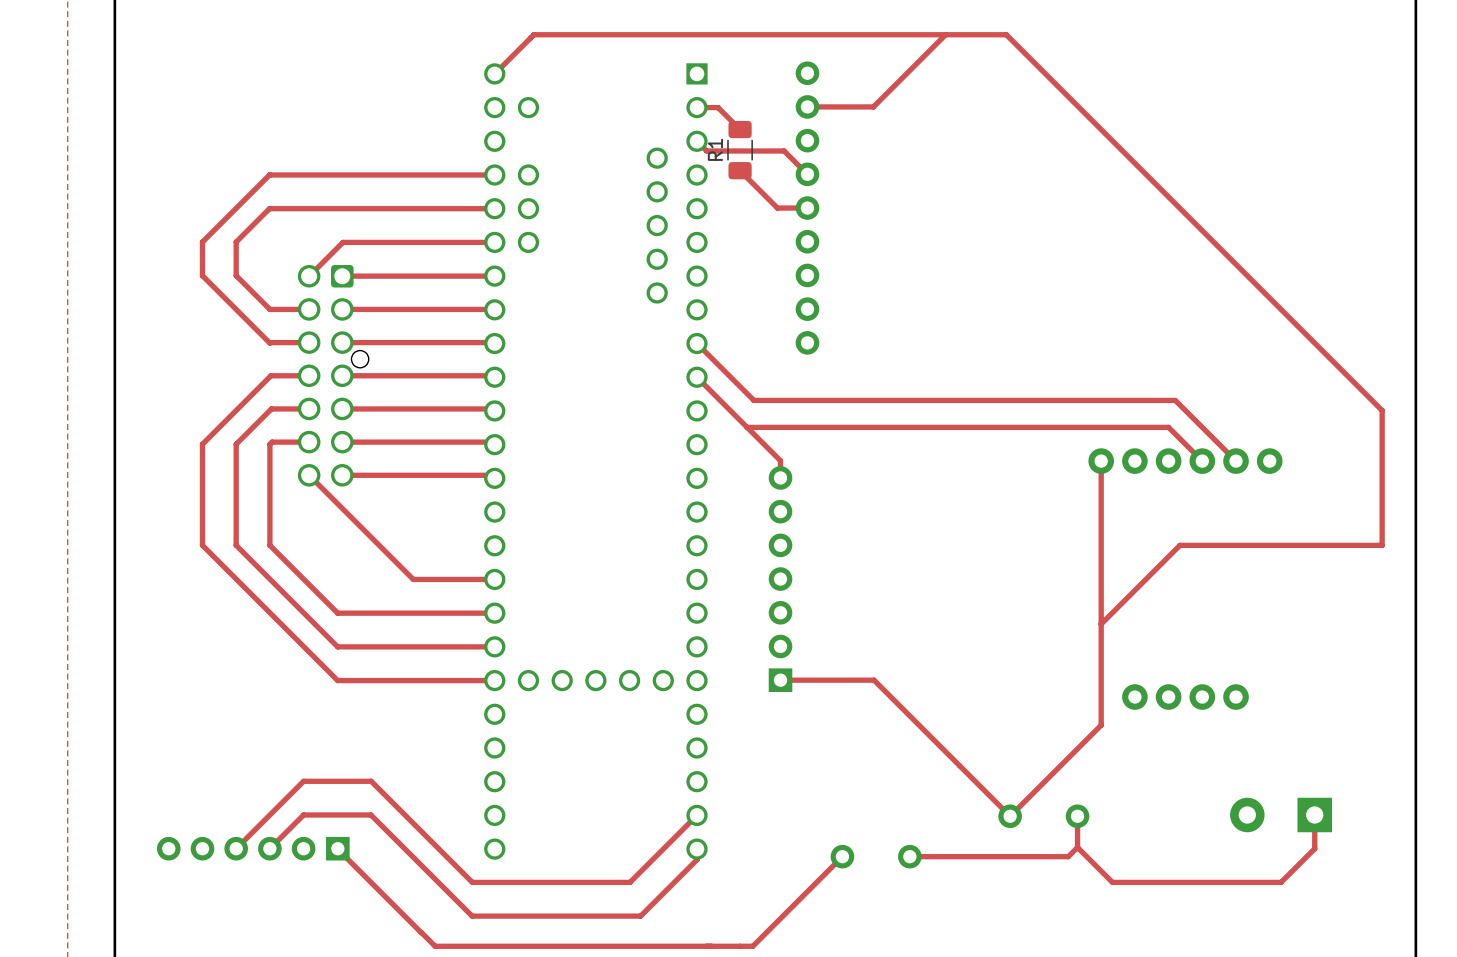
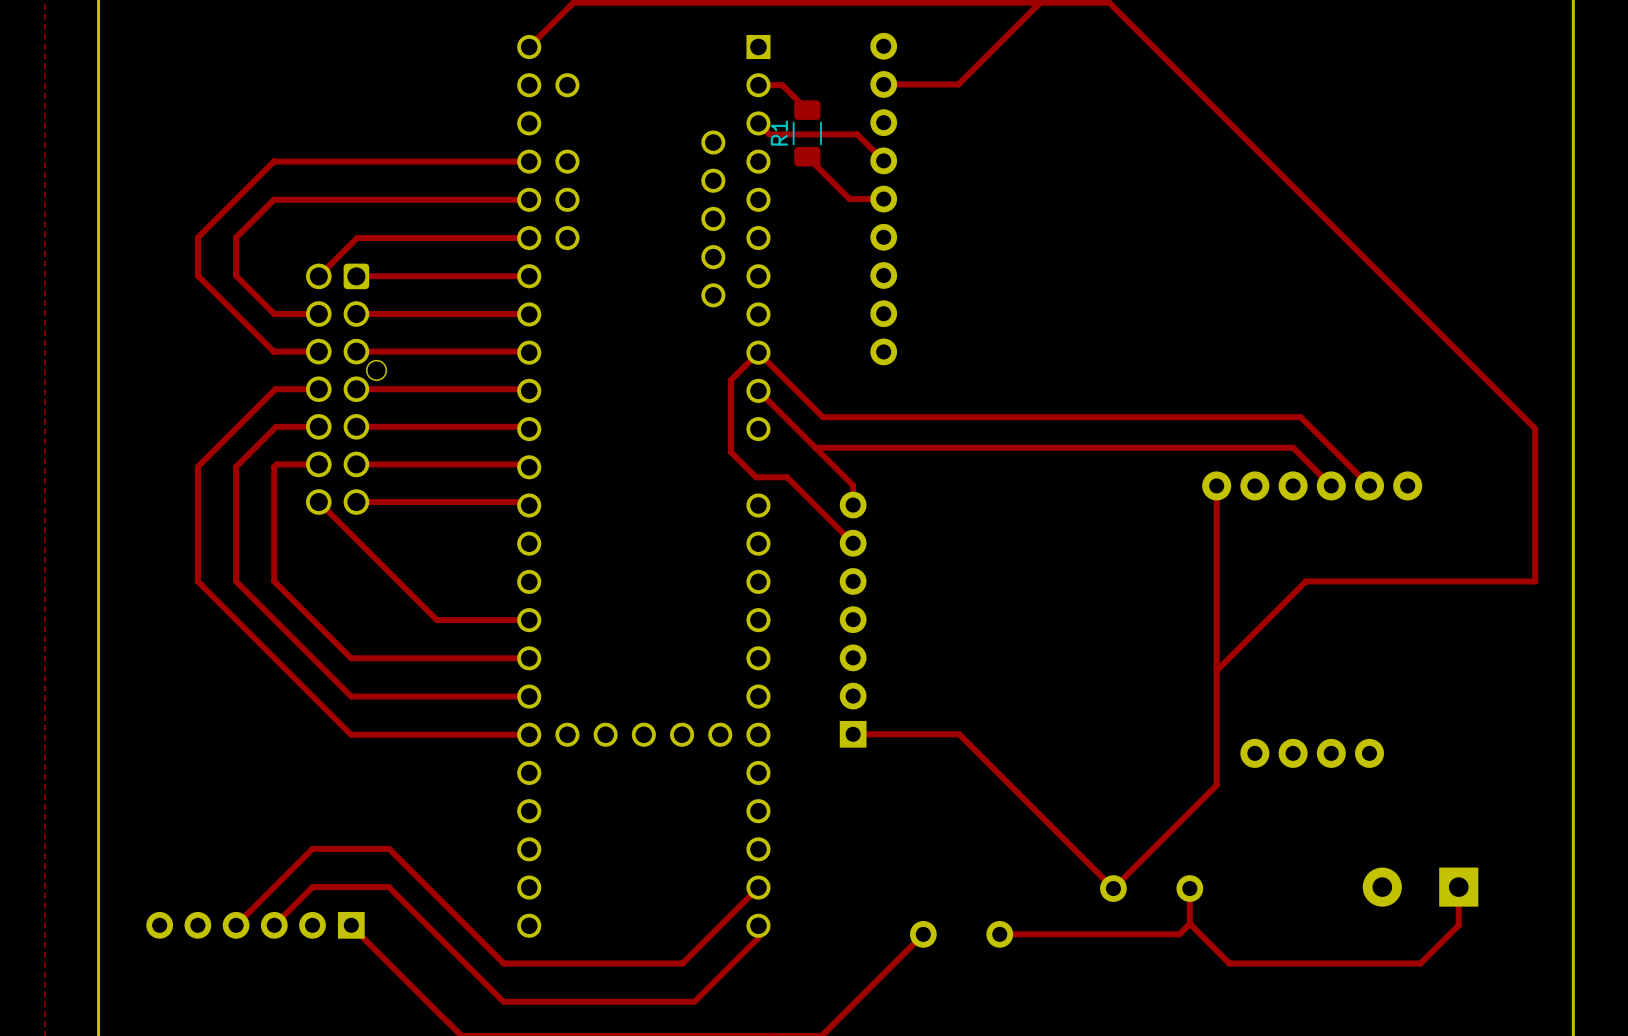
part footprint: [484, 63, 708, 860] -> [517, 34, 771, 938]
track: none -> (758, 352) (730, 380) (730, 452) (756, 477) (787, 477) (853, 543)

